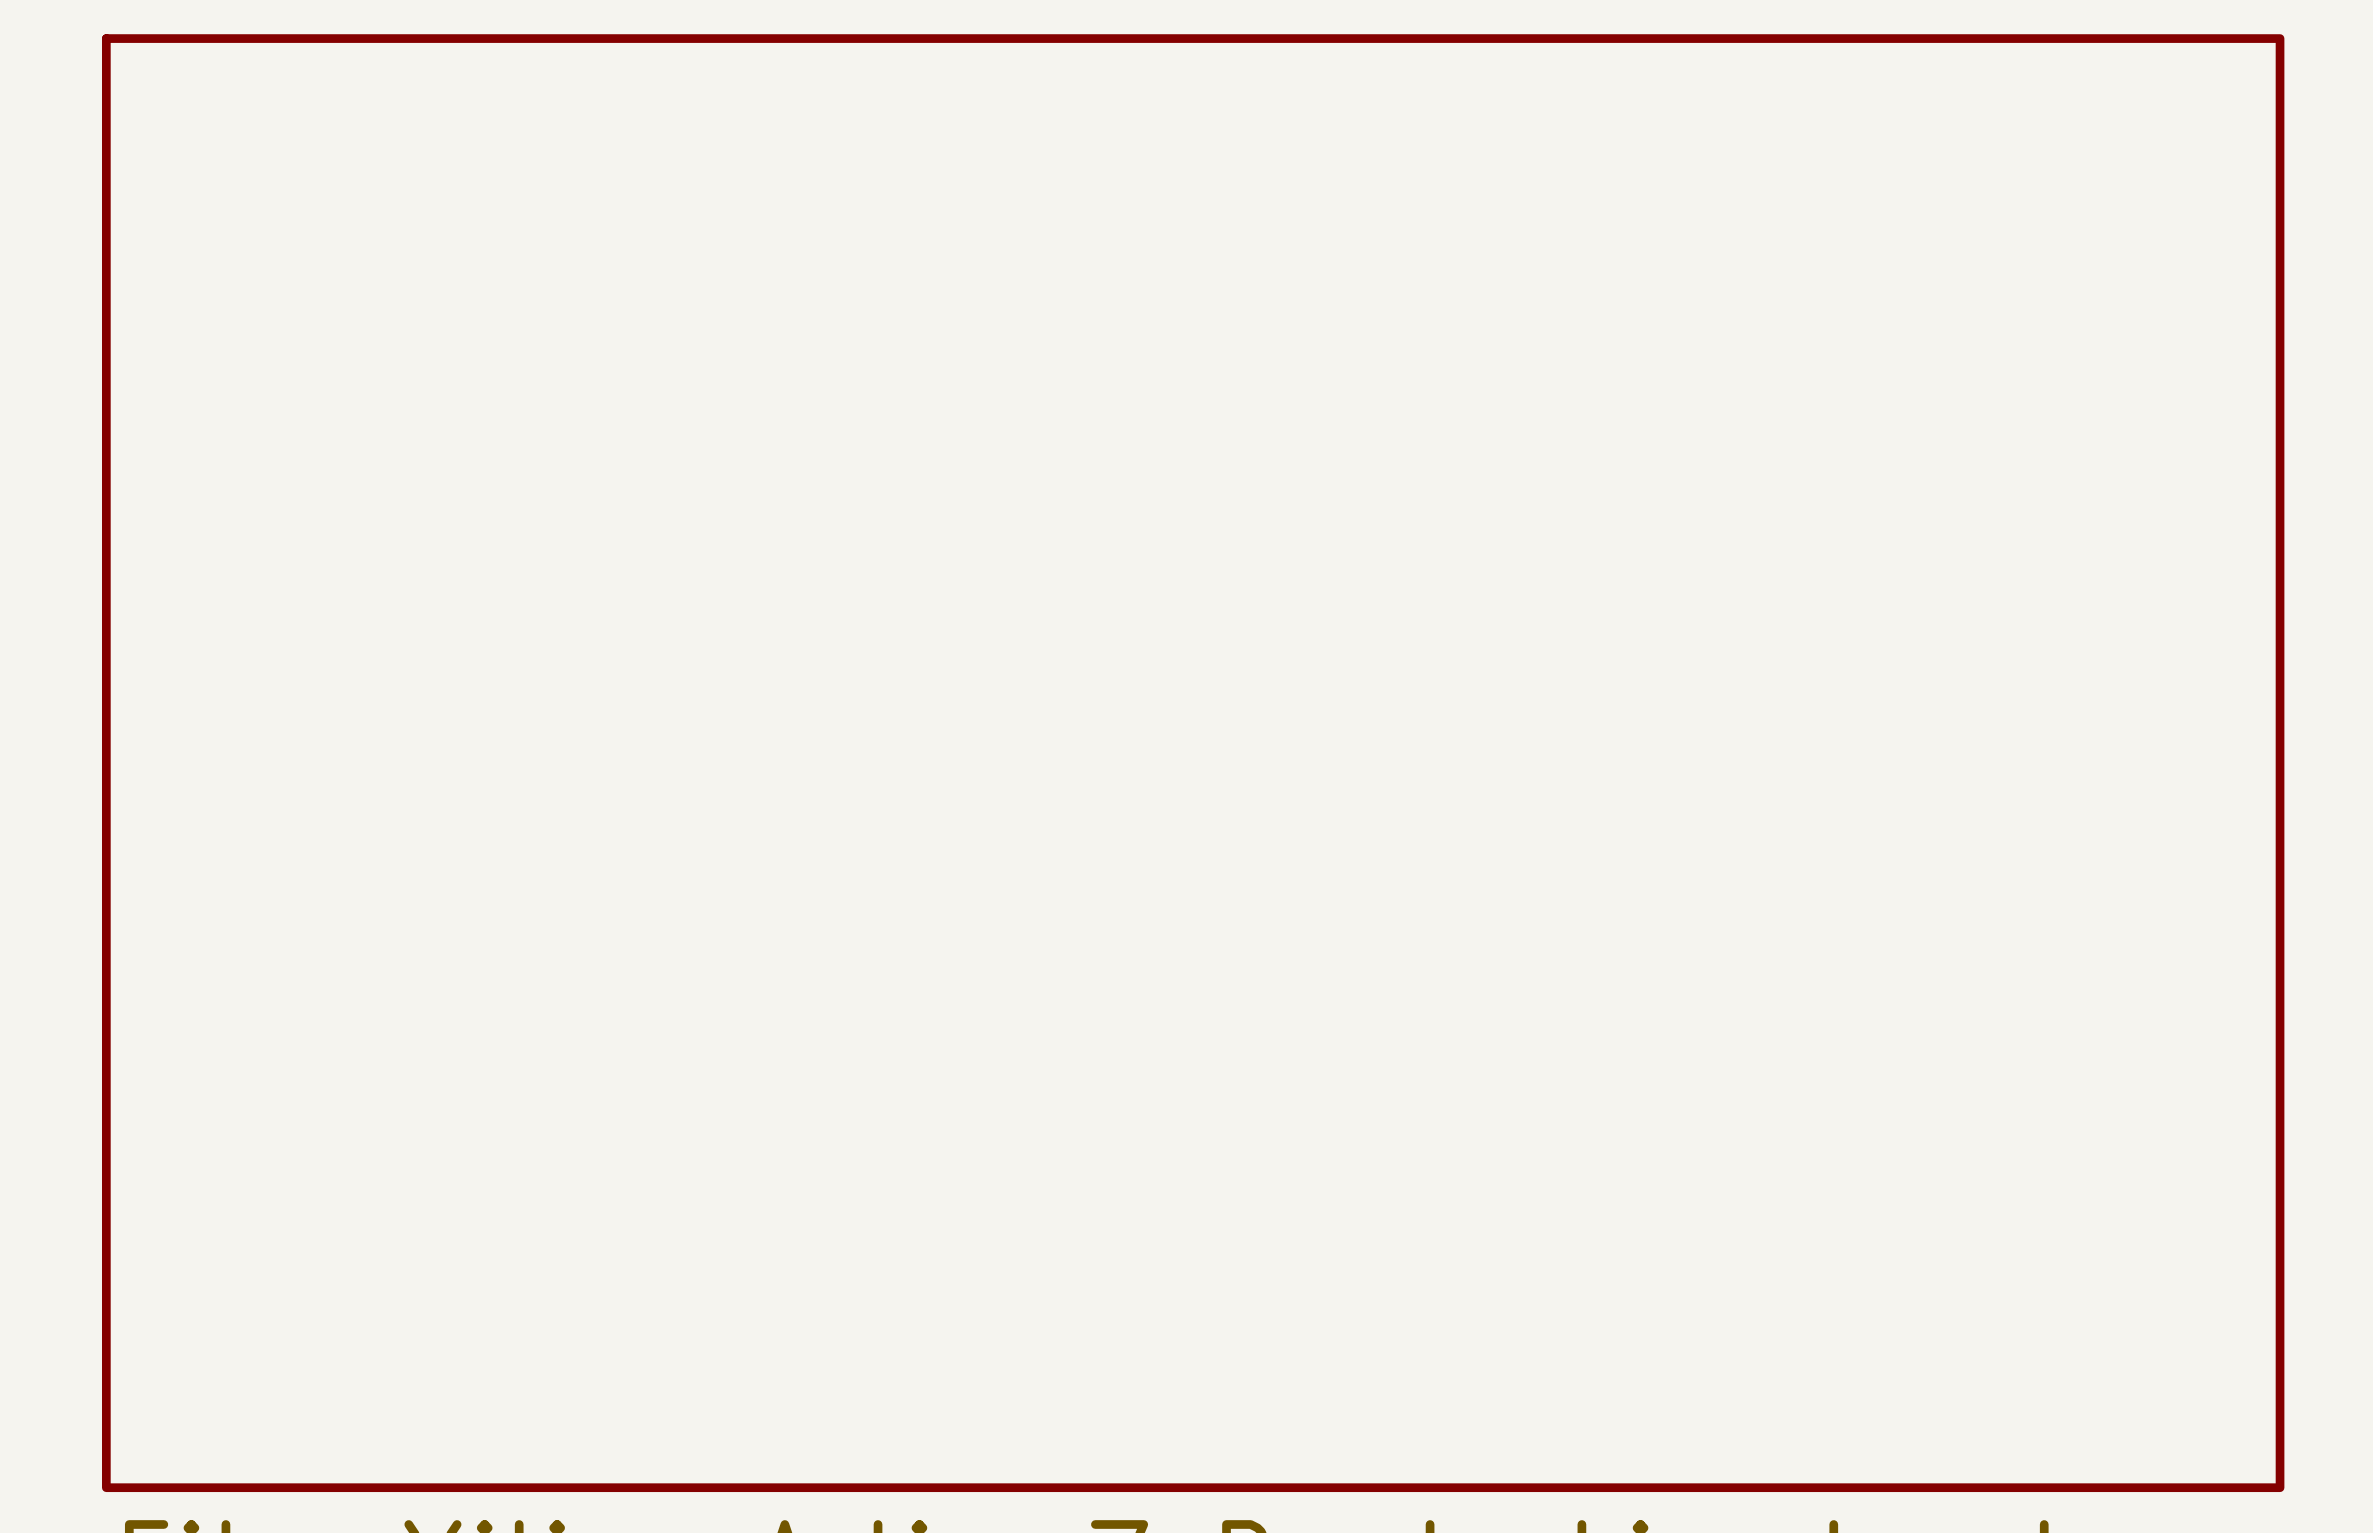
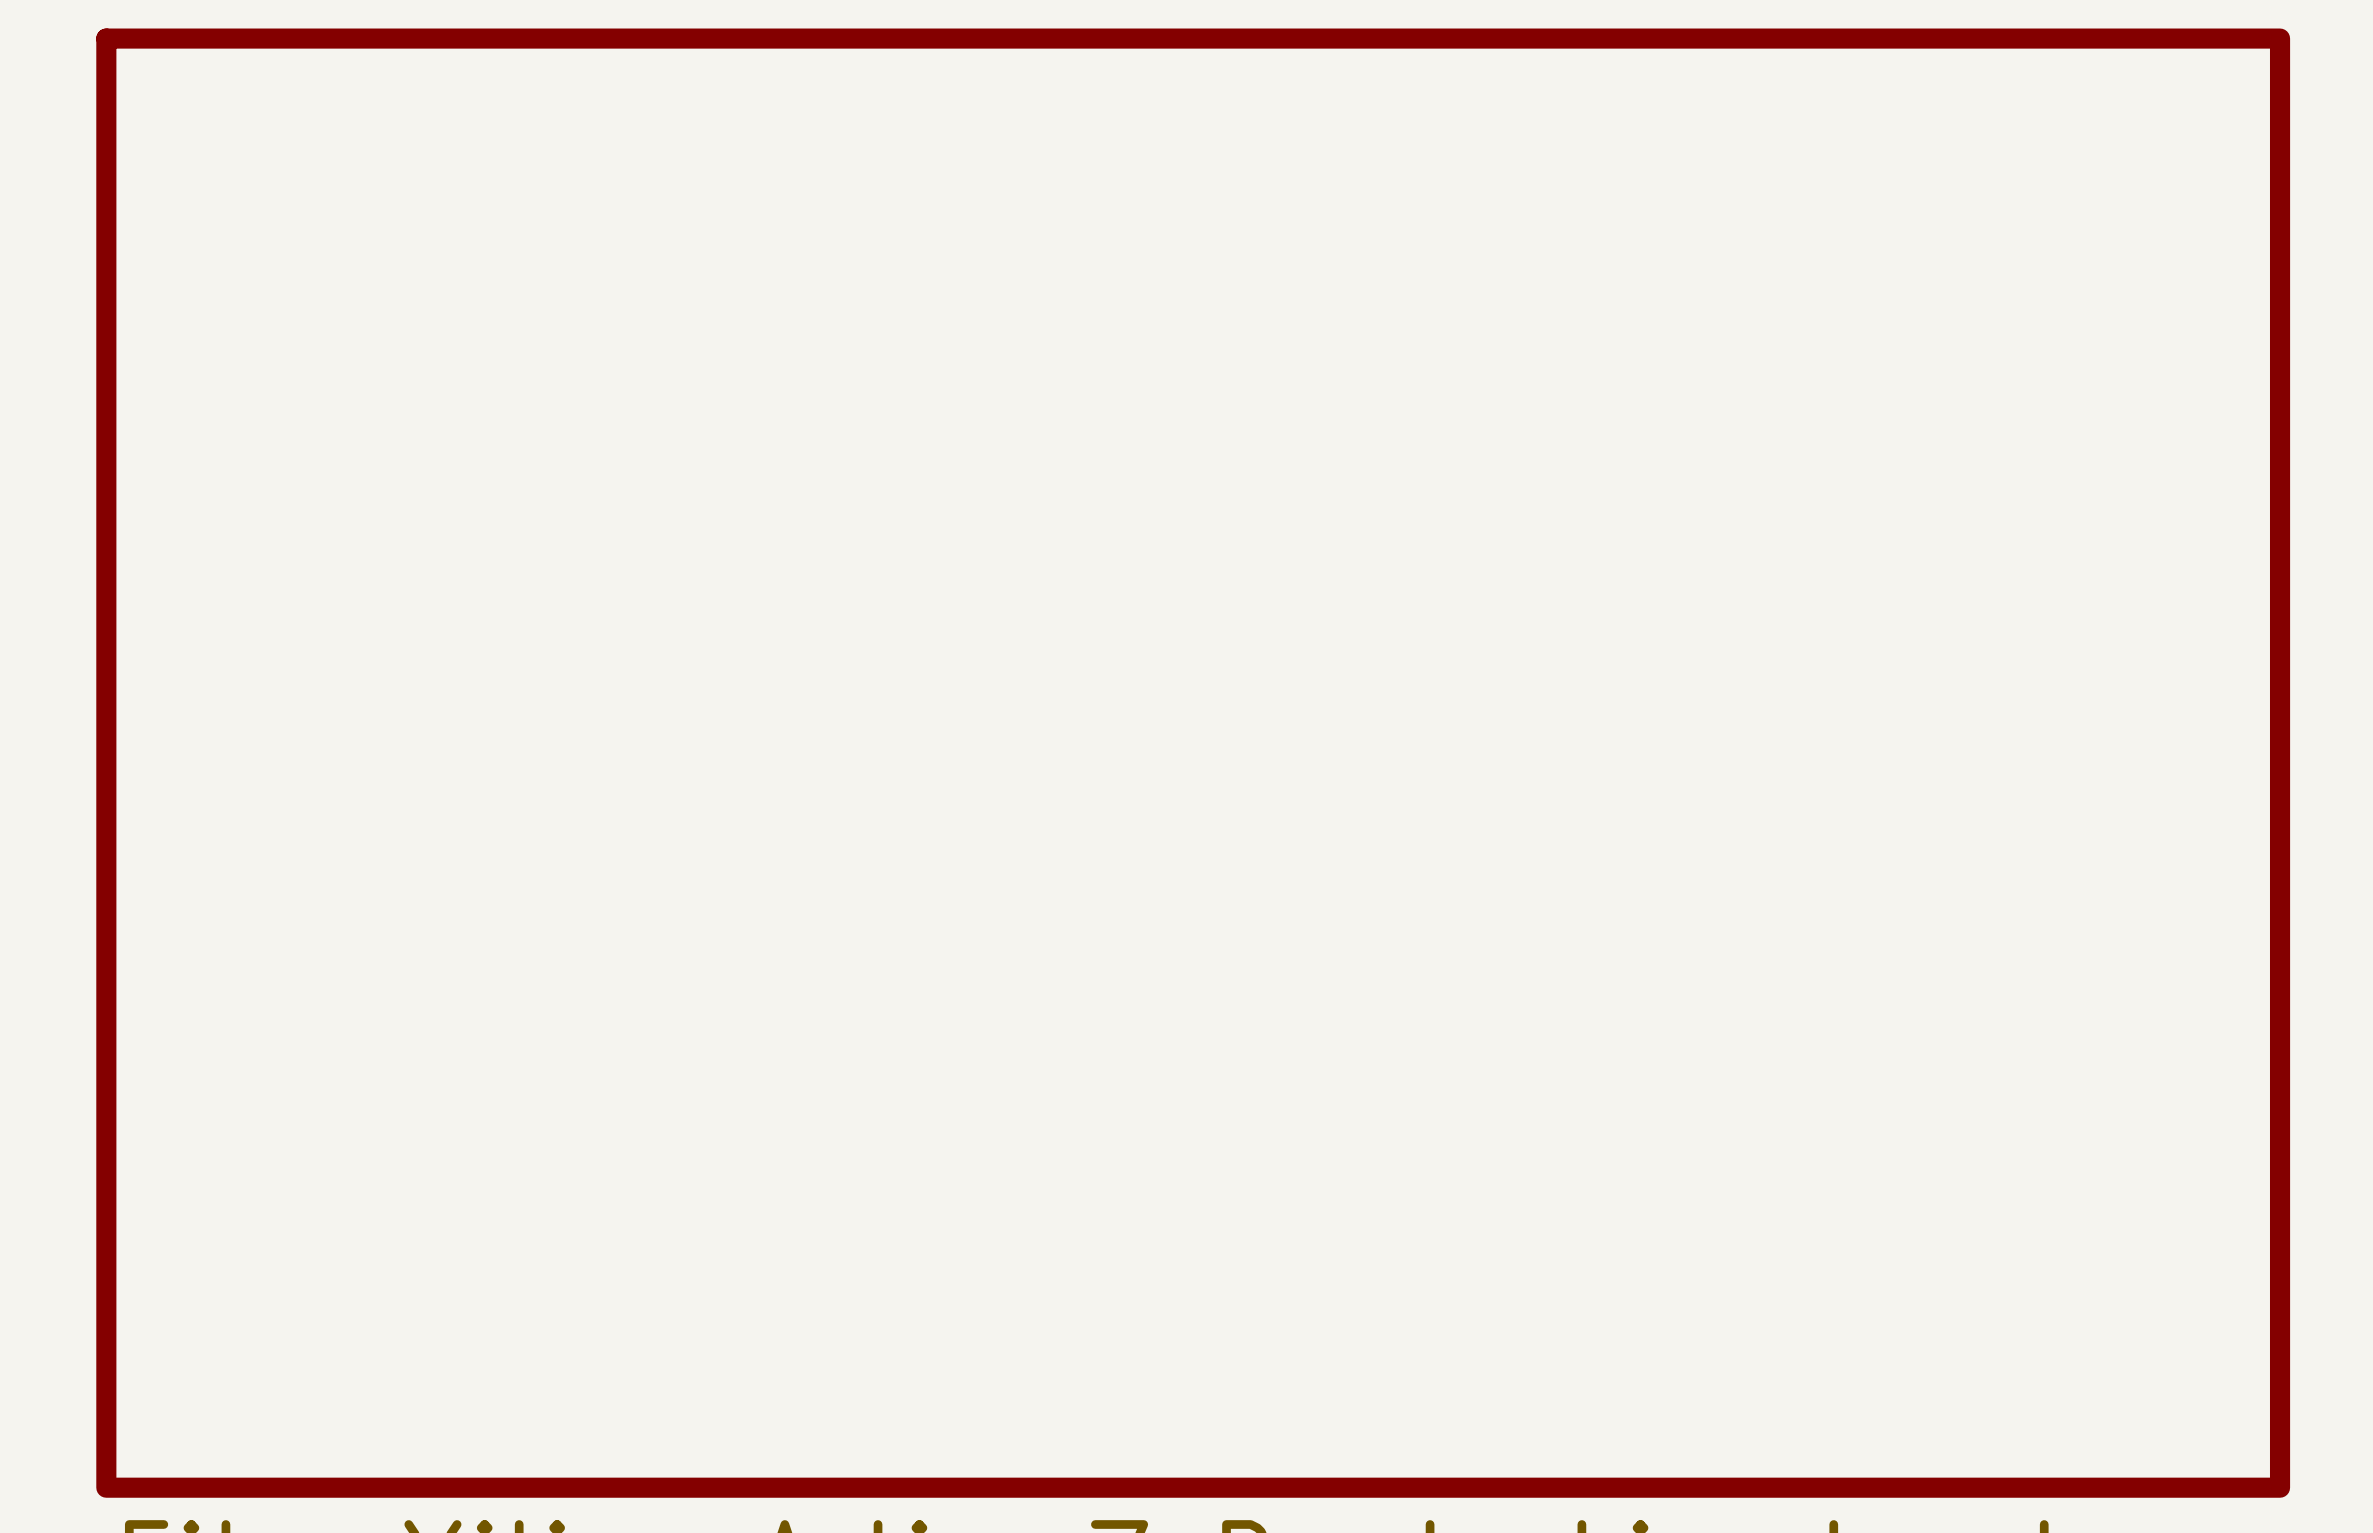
sheet shape: [102, 34, 2285, 1493] -> [96, 28, 2291, 1498]

